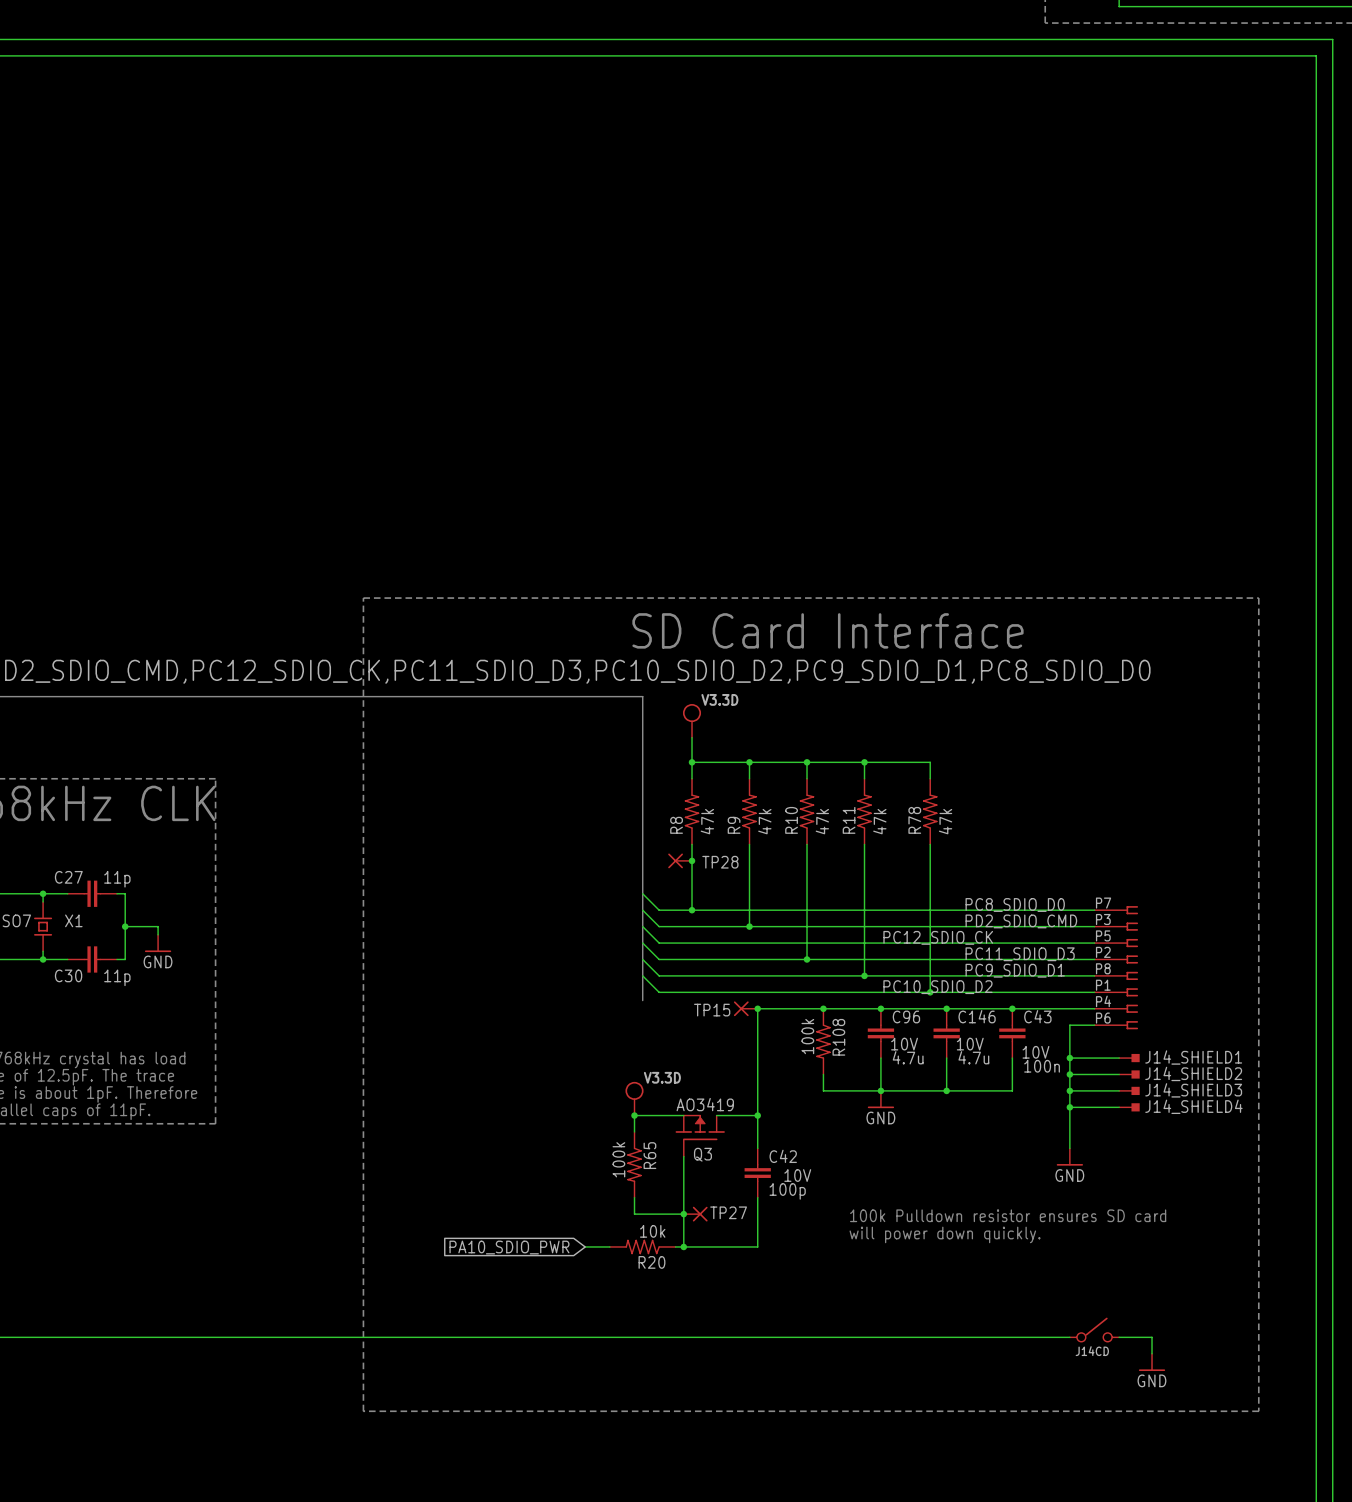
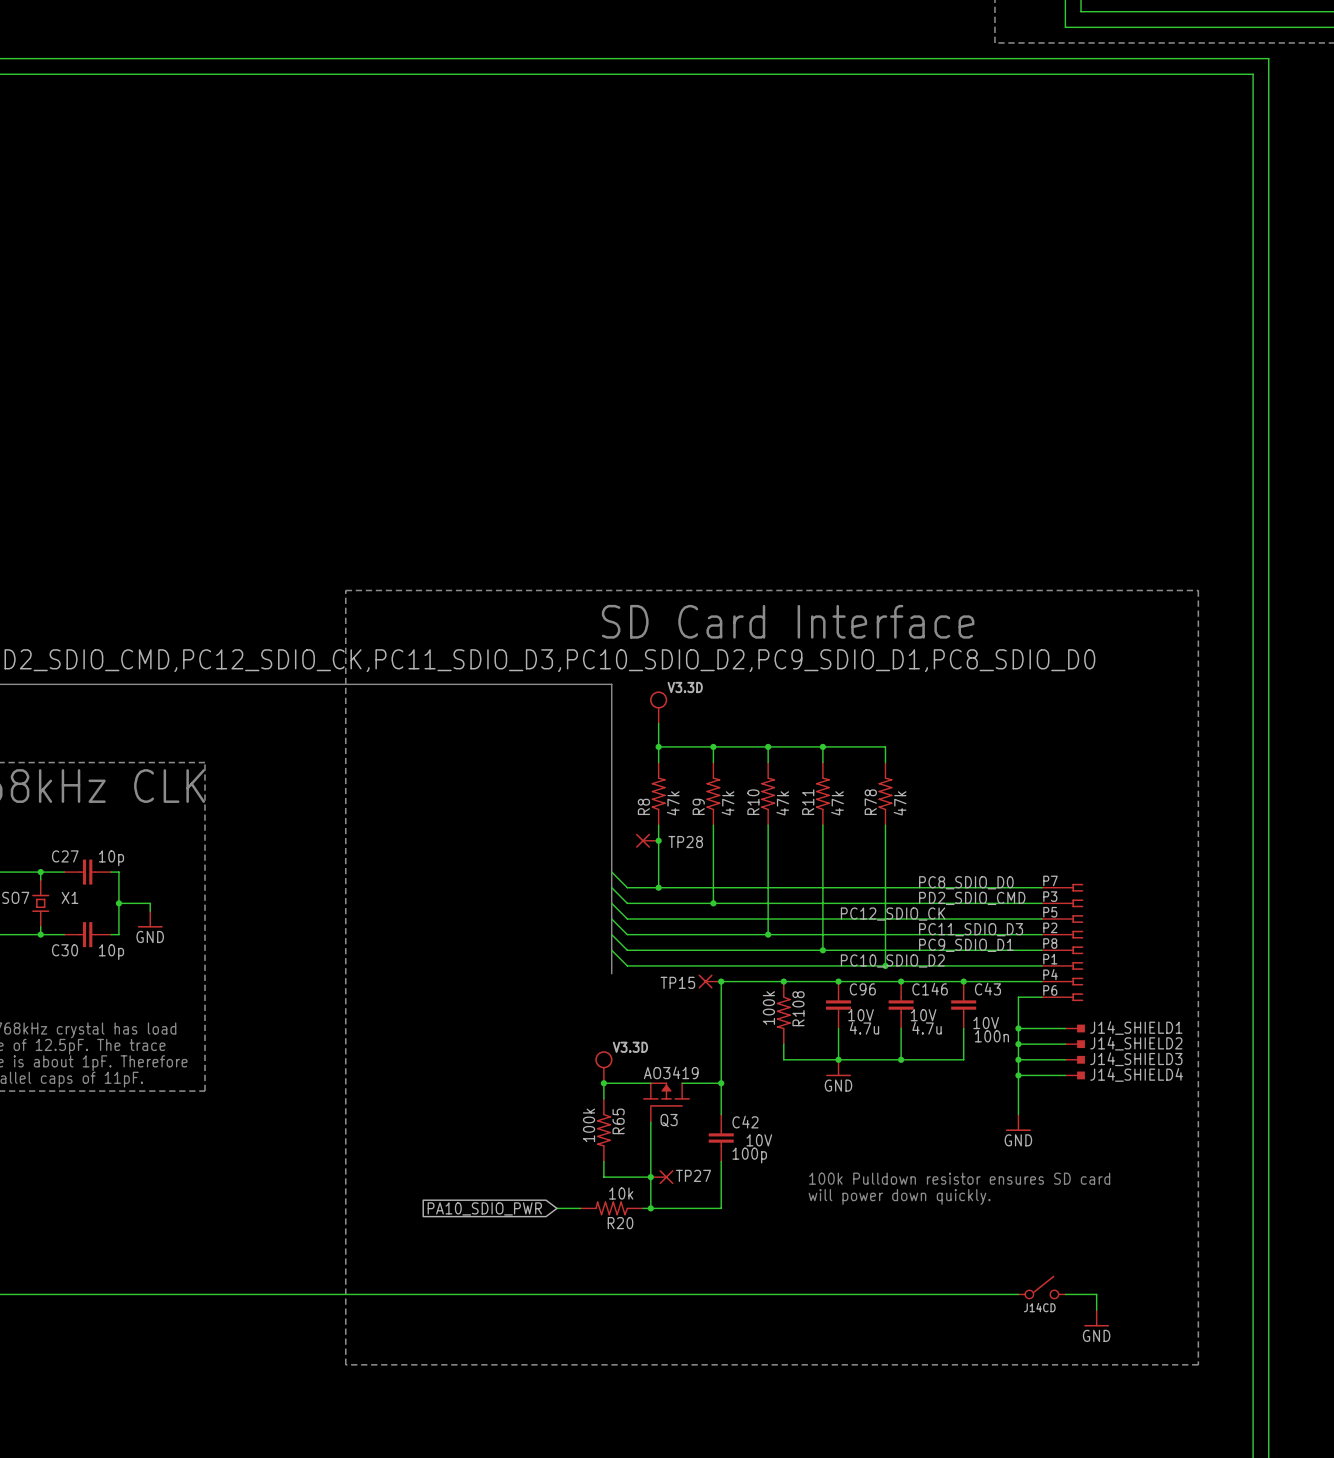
C27 value: 11p (117, 879) -> 10p (111, 858)
C30 value: 11p (117, 977) -> 10p (111, 952)

